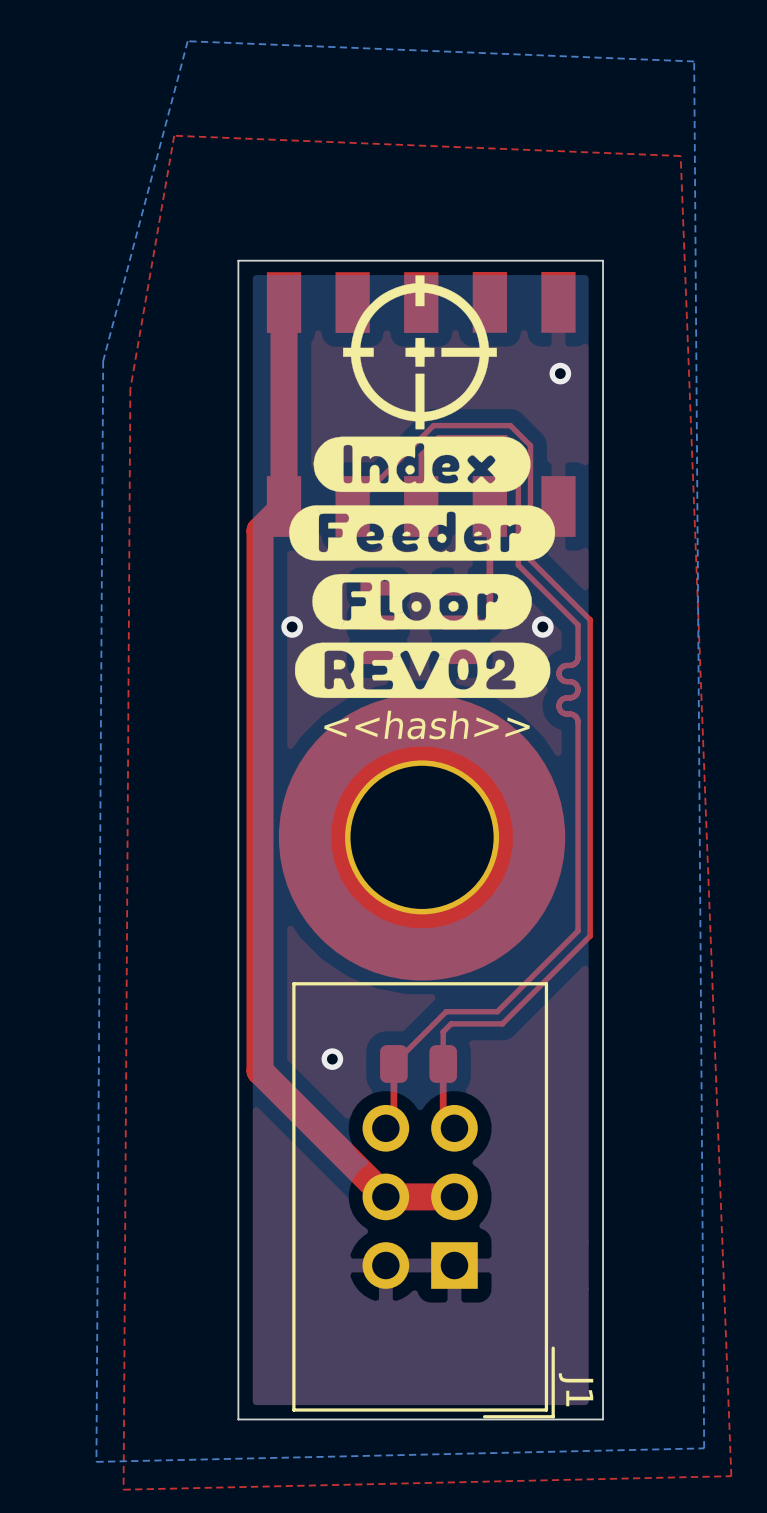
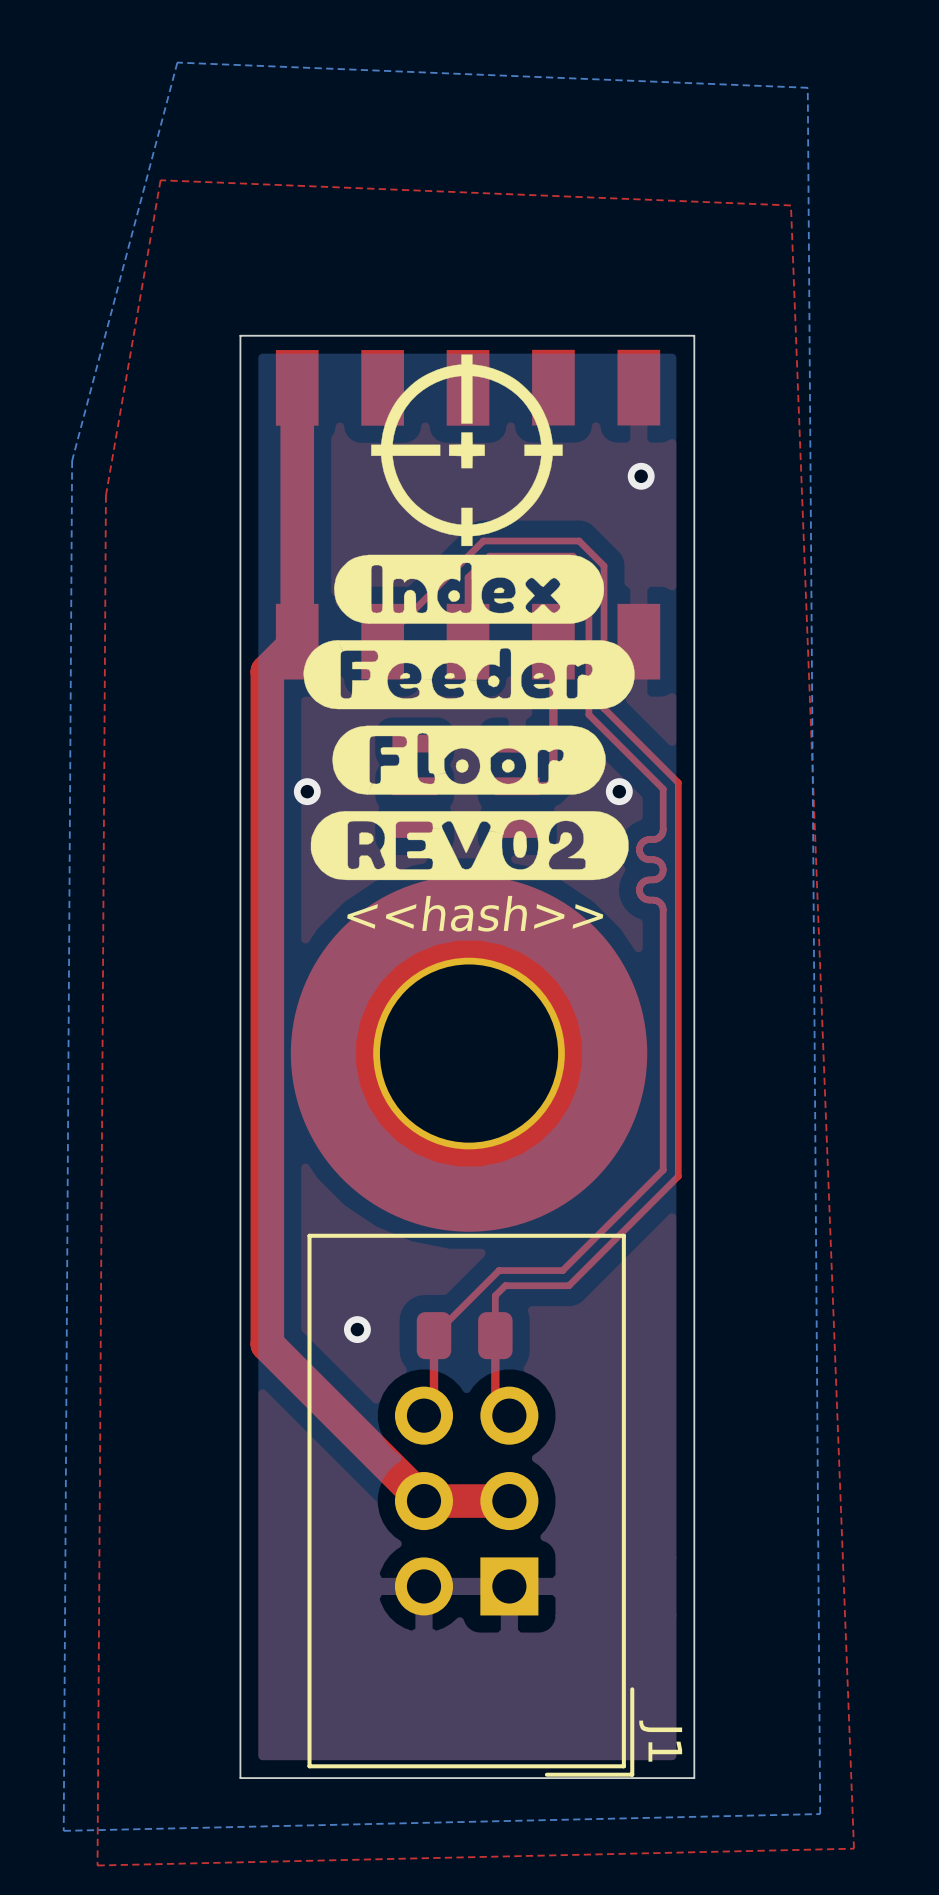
drawing shape: [343, 275, 497, 430] -> [371, 354, 563, 547]

